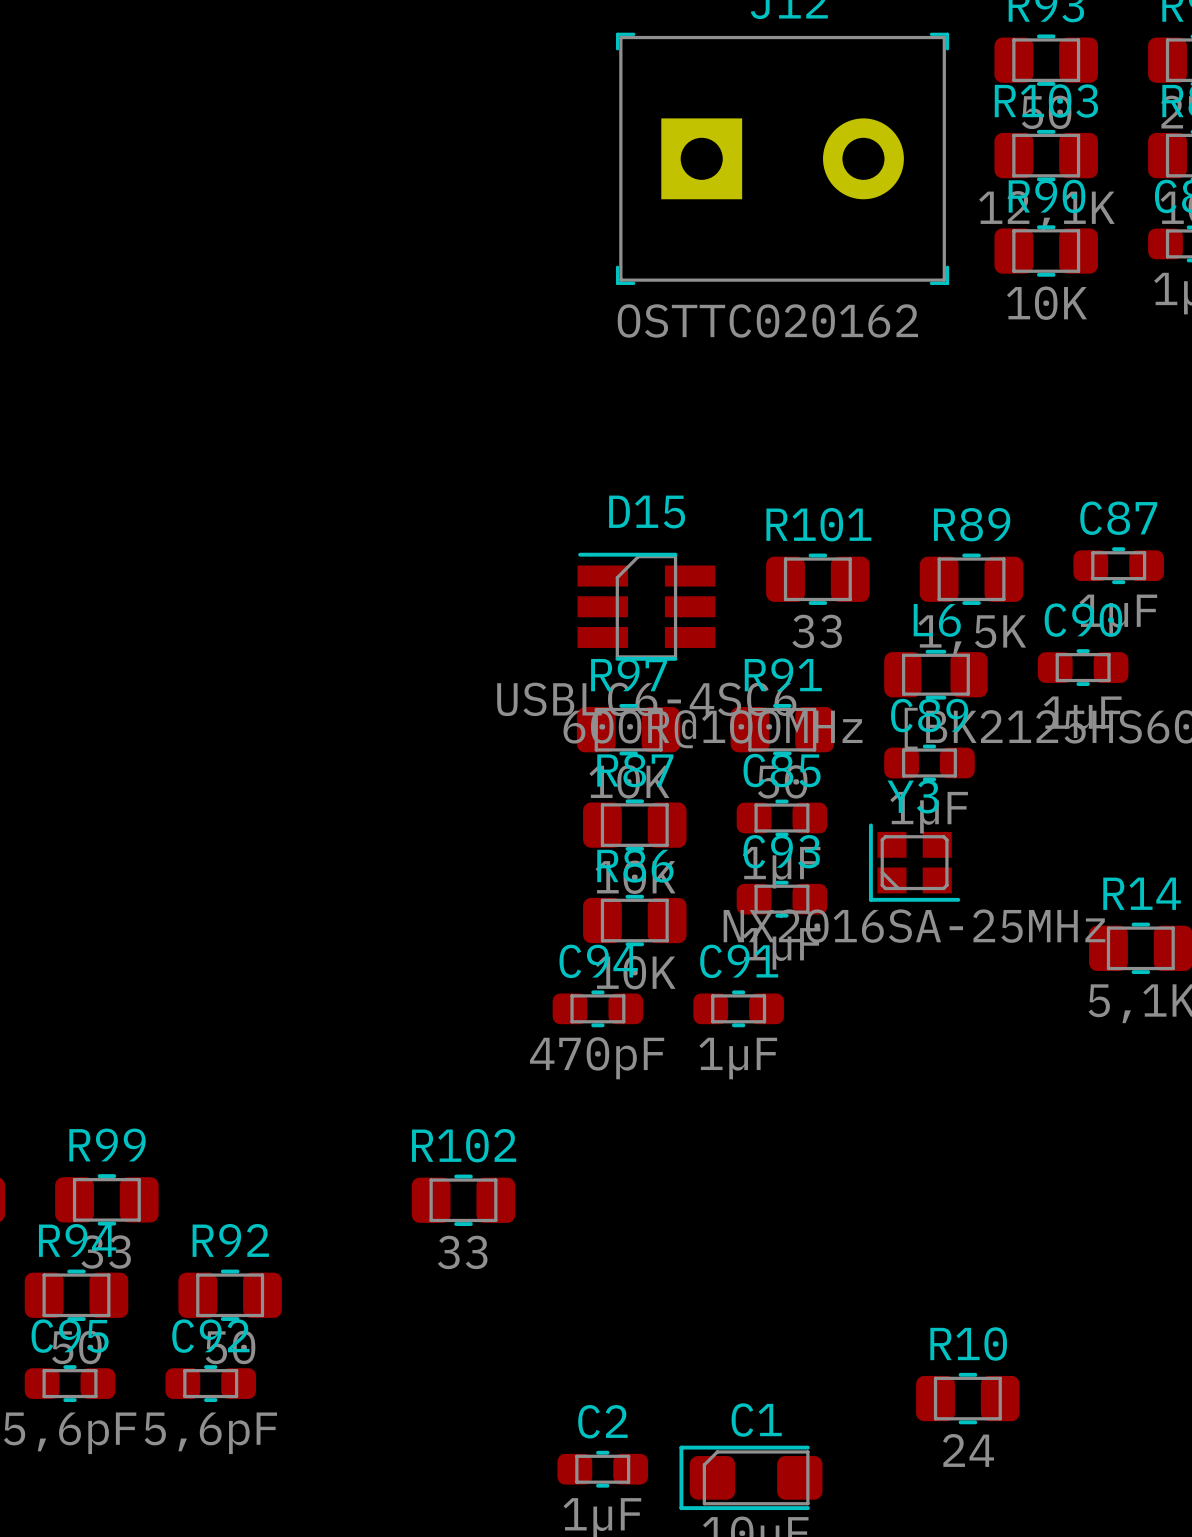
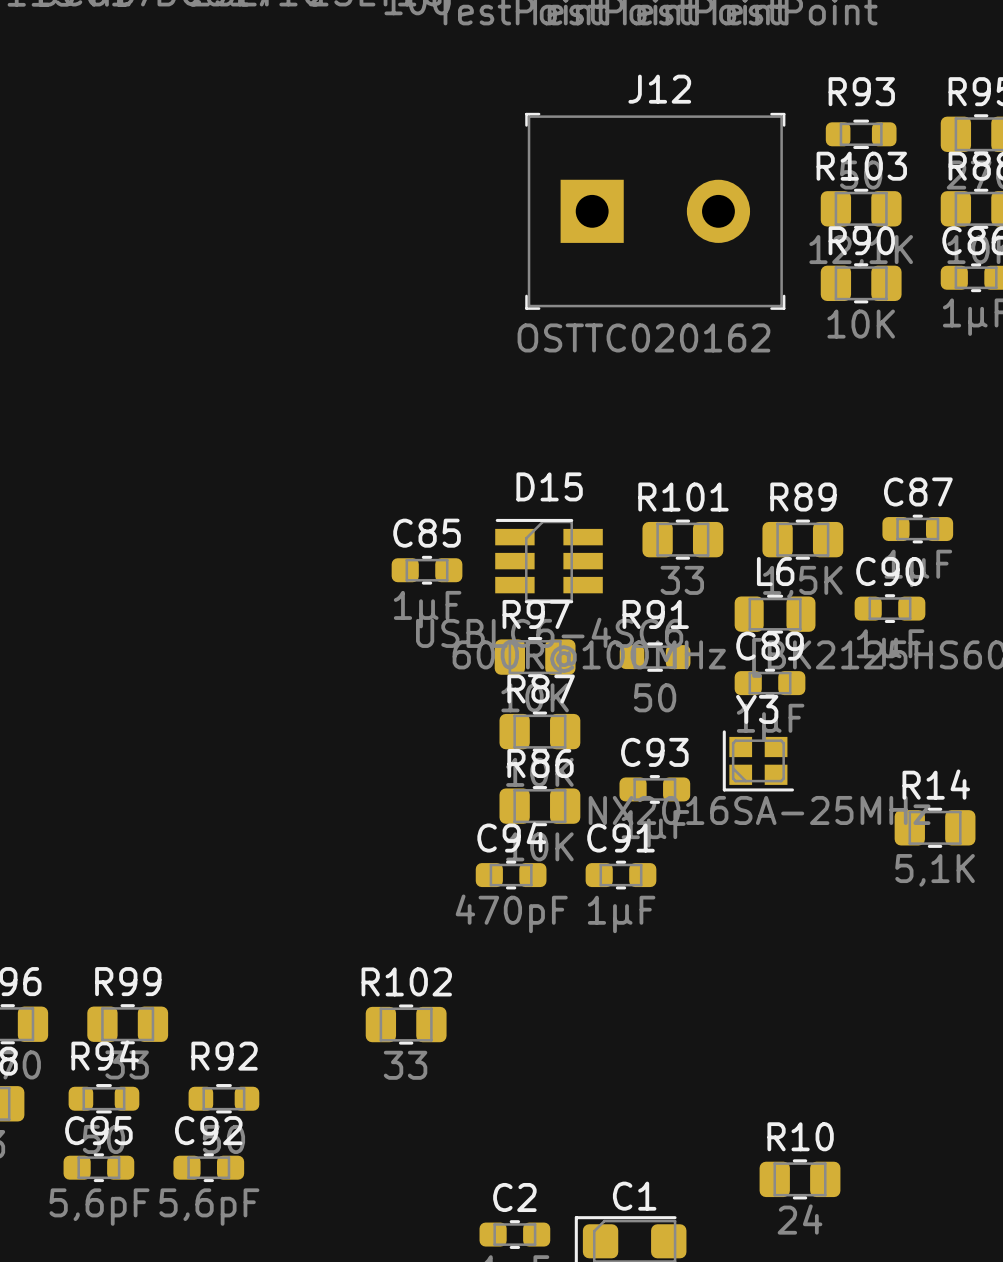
R93 footprint: [994, 34, 1098, 86] -> [825, 119, 897, 150]
R91 footprint: [730, 703, 835, 756] -> [619, 642, 691, 672]
C85 position: (781, 817) -> (427, 570)
R94 footprint: [24, 1269, 129, 1322] -> [68, 1084, 140, 1114]
R92 footprint: [178, 1269, 282, 1322] -> [188, 1084, 260, 1114]

